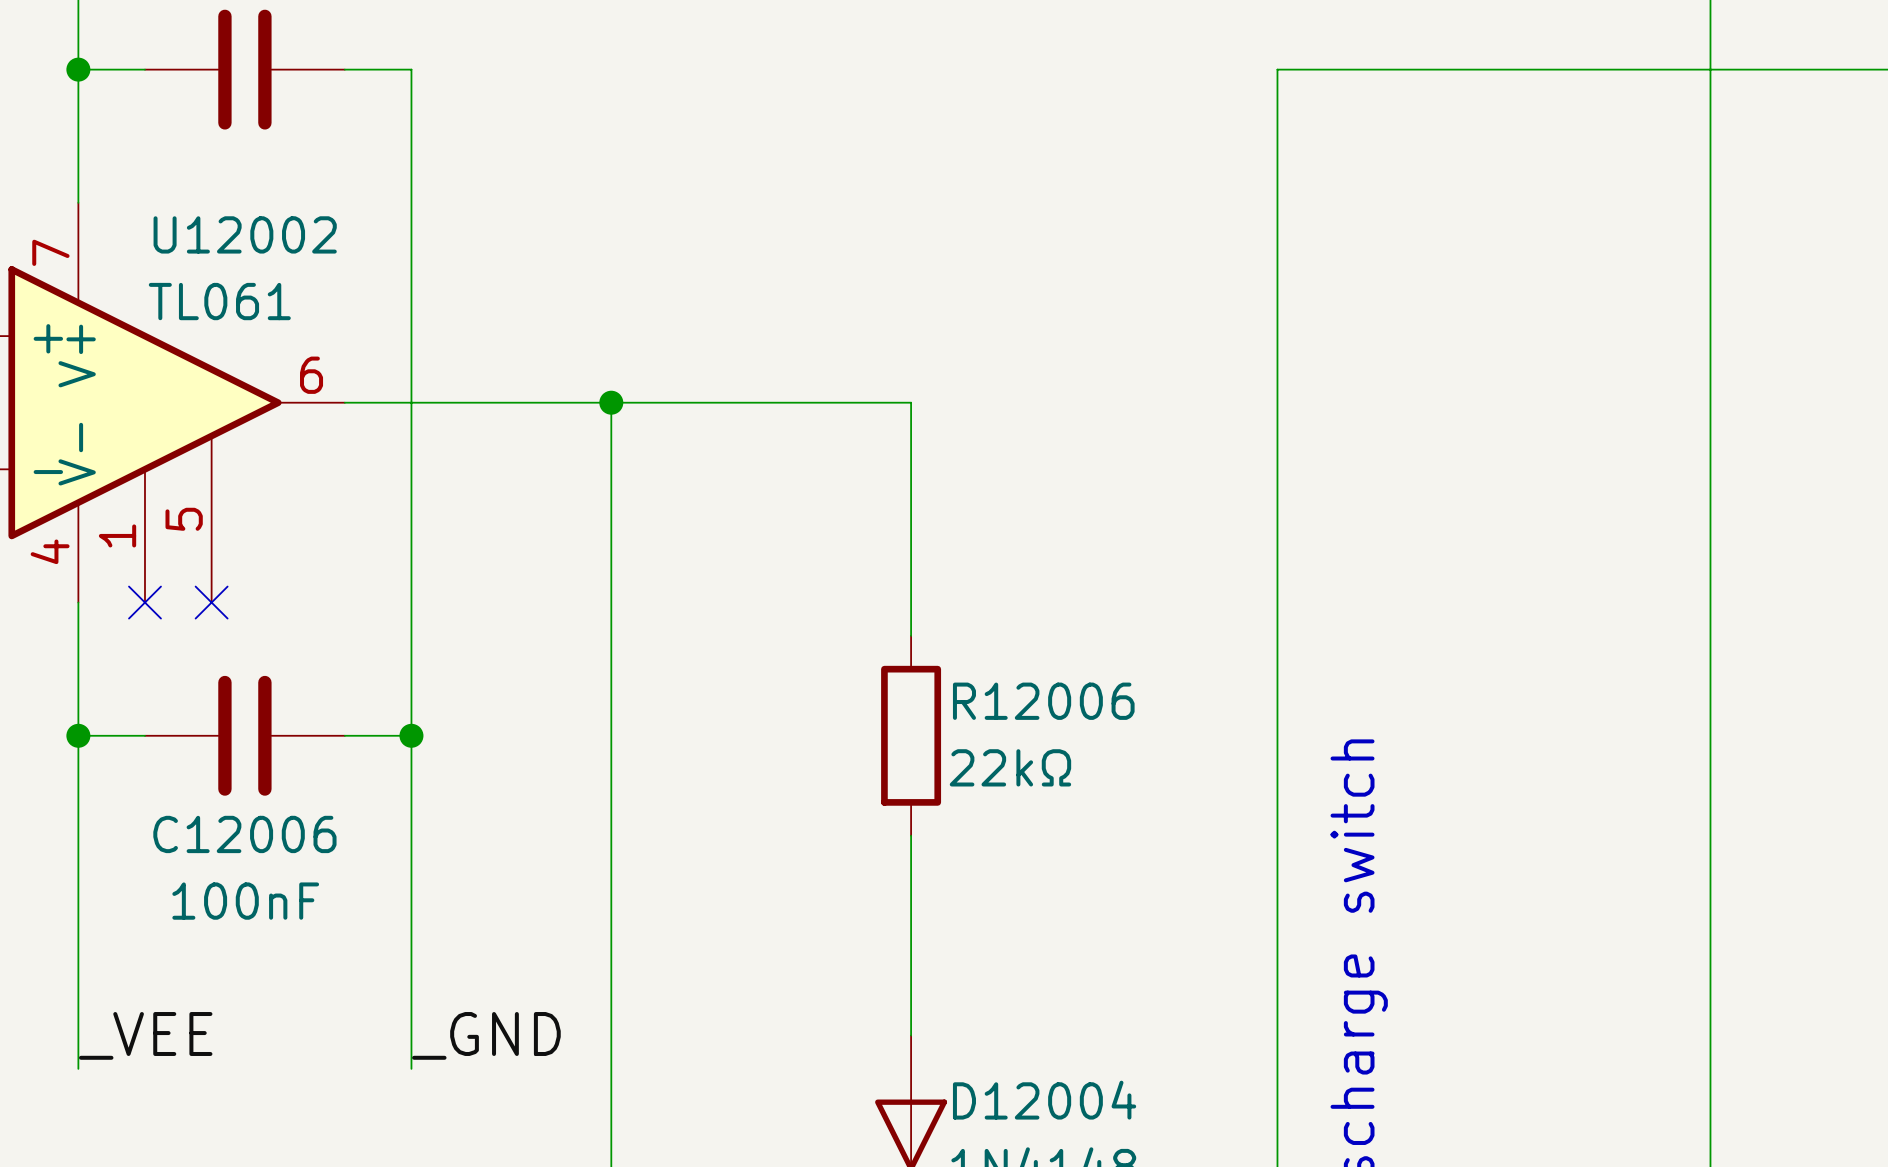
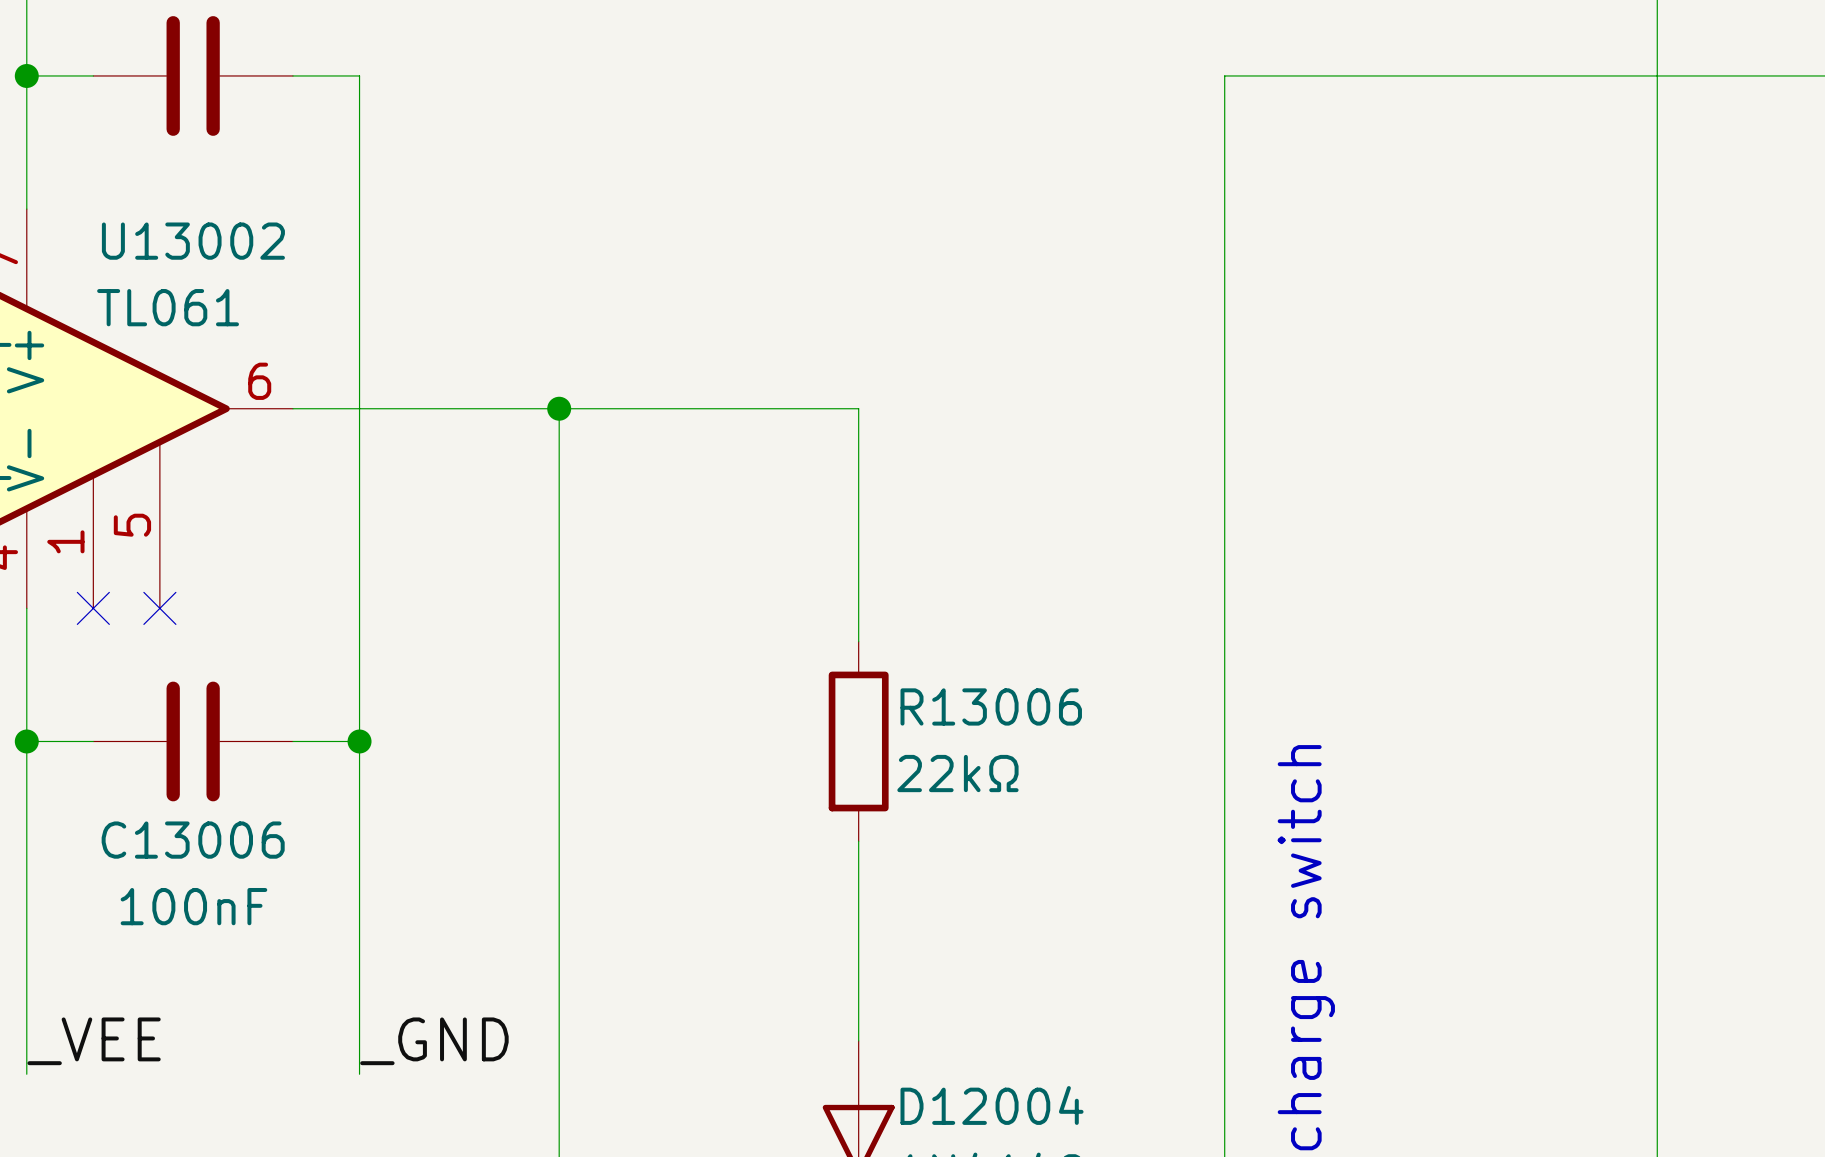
U12002 name: U12002 (245, 234) -> U13002 (193, 241)
R12006 name: R12006 (1043, 701) -> R13006 (991, 706)
C12006 name: C12006 (244, 834) -> C13006 (193, 840)

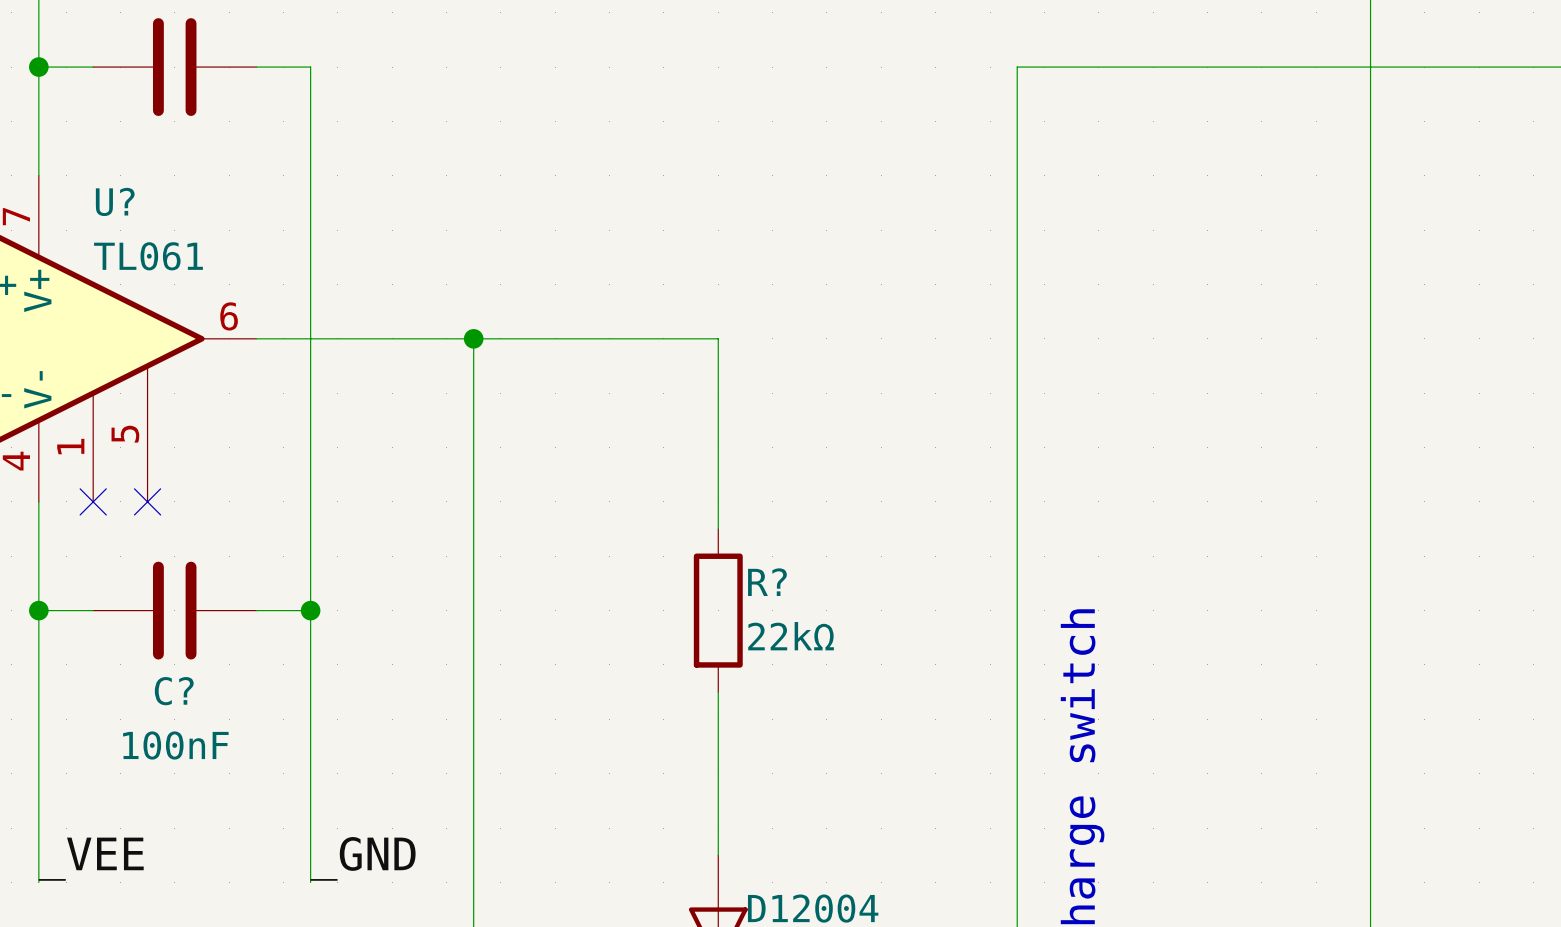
U13002 name: U13002 (193, 241) -> U? (115, 201)
R13006 name: R13006 (991, 706) -> R? (767, 582)
C13006 name: C13006 (193, 840) -> C? (174, 691)

